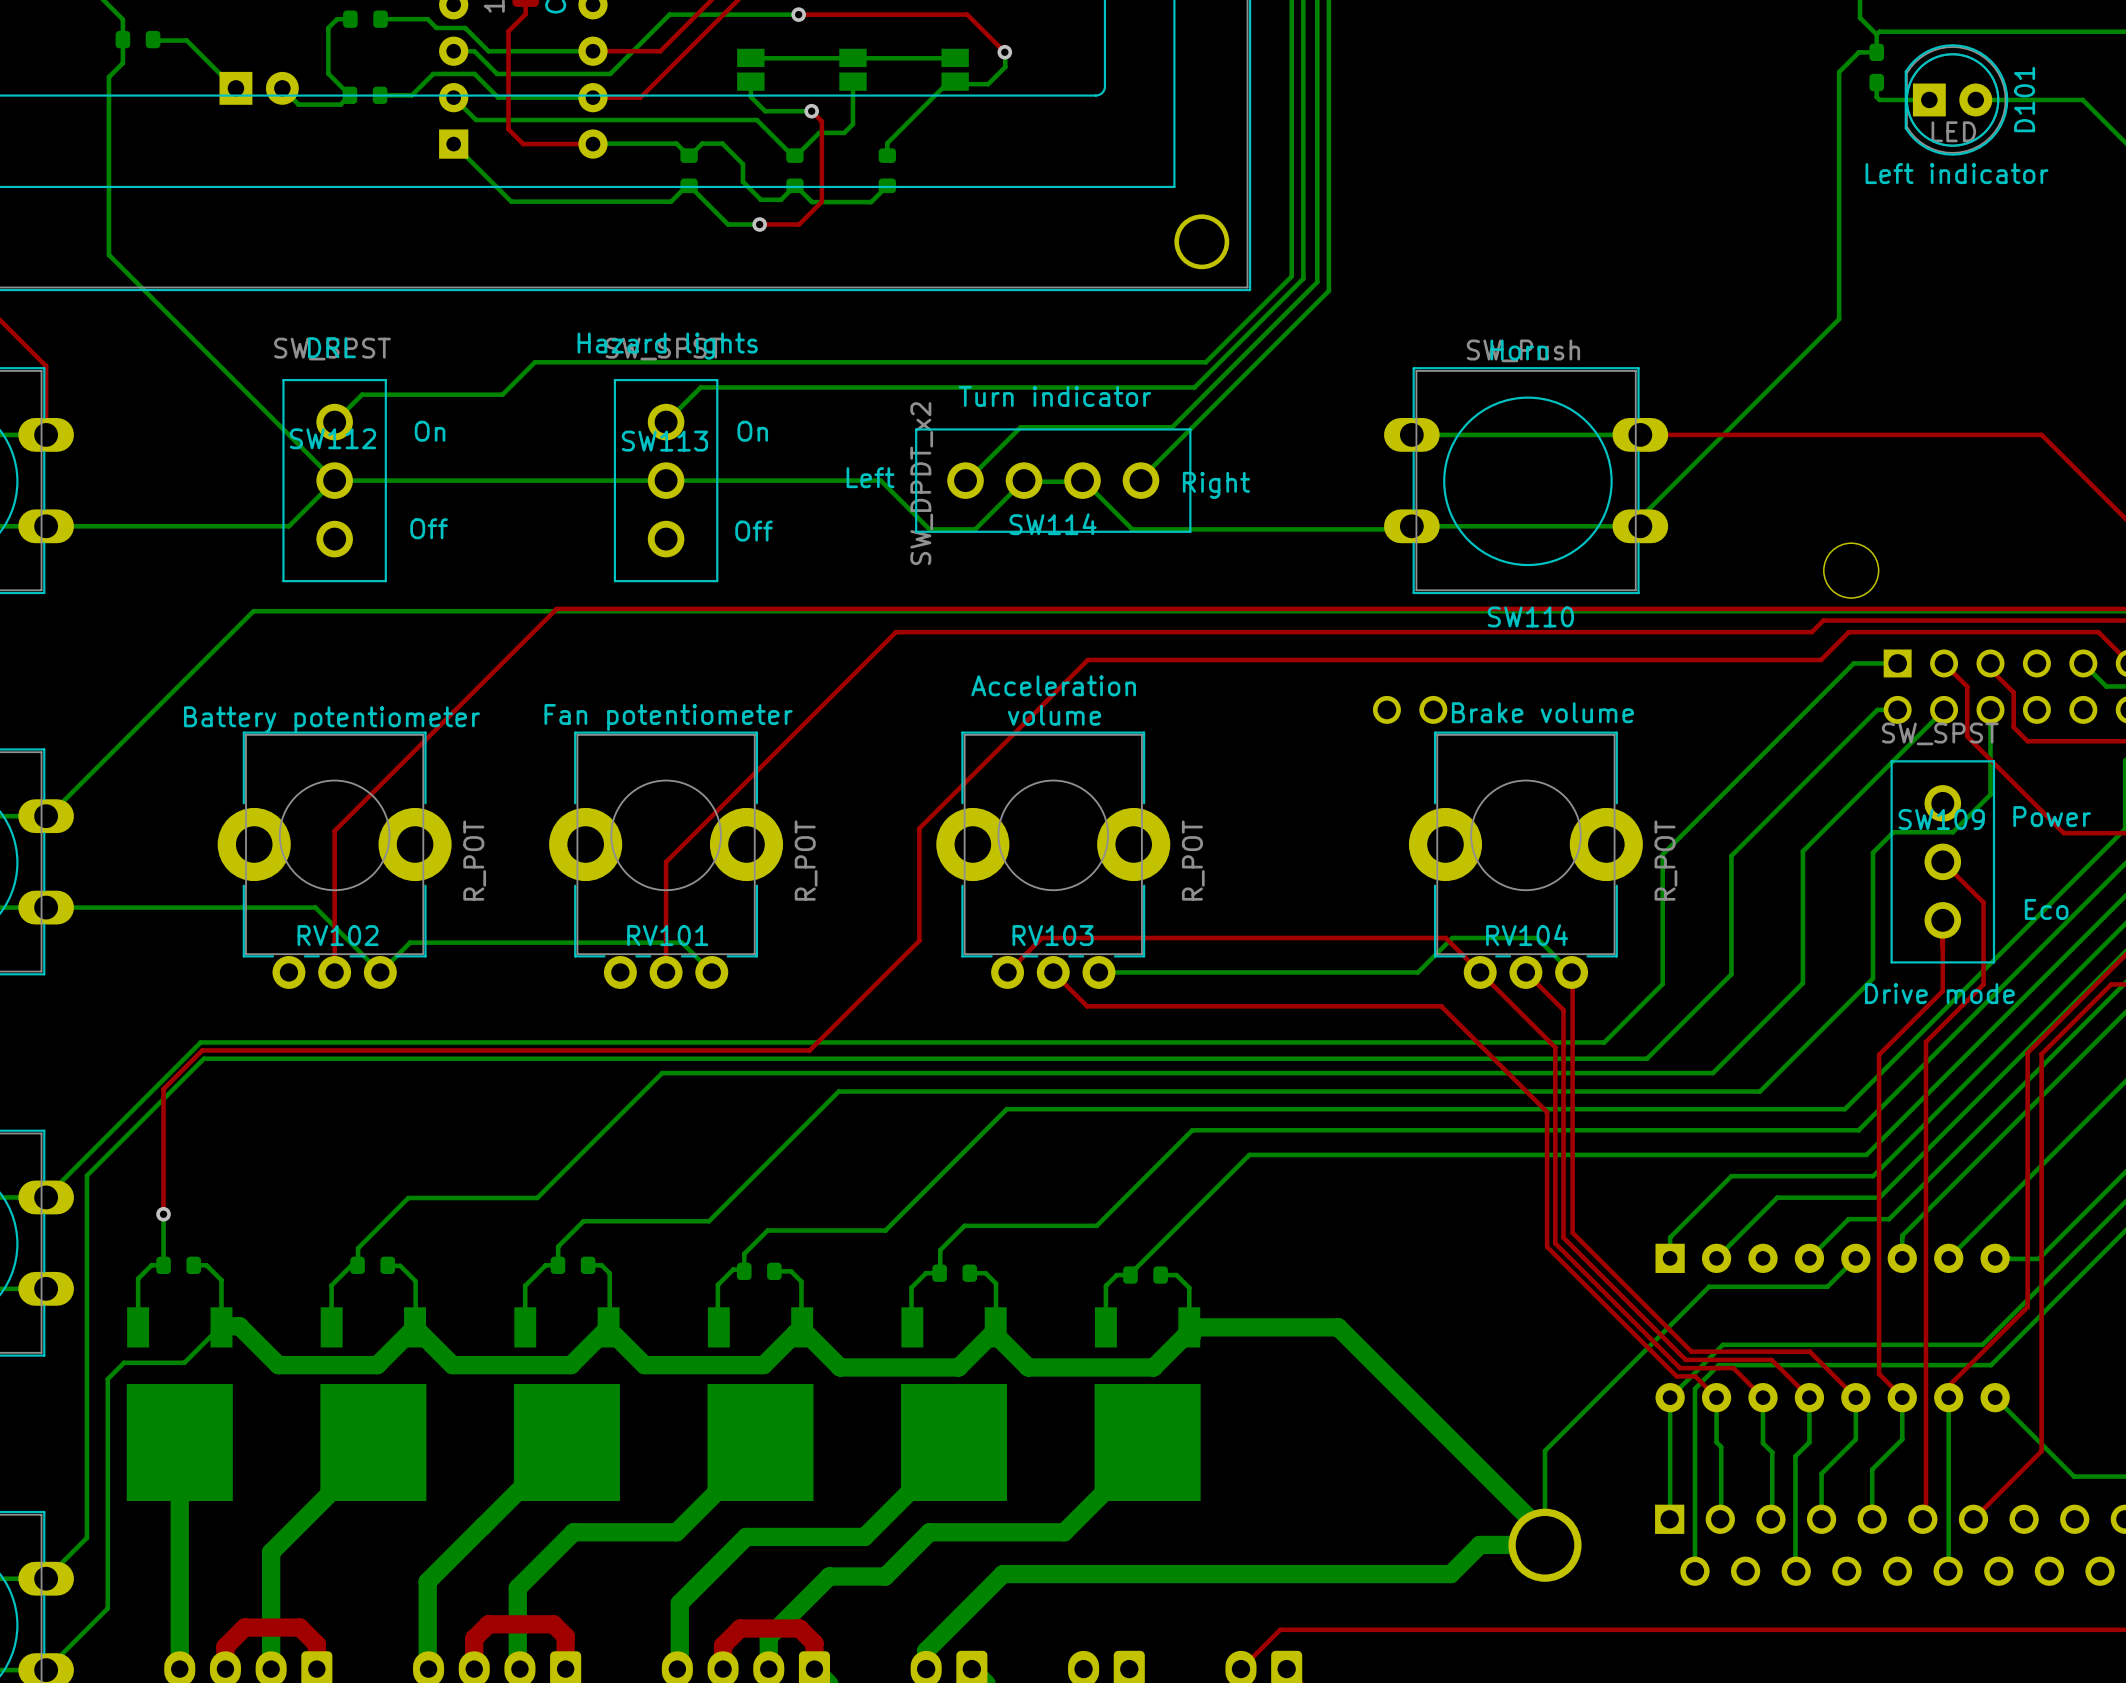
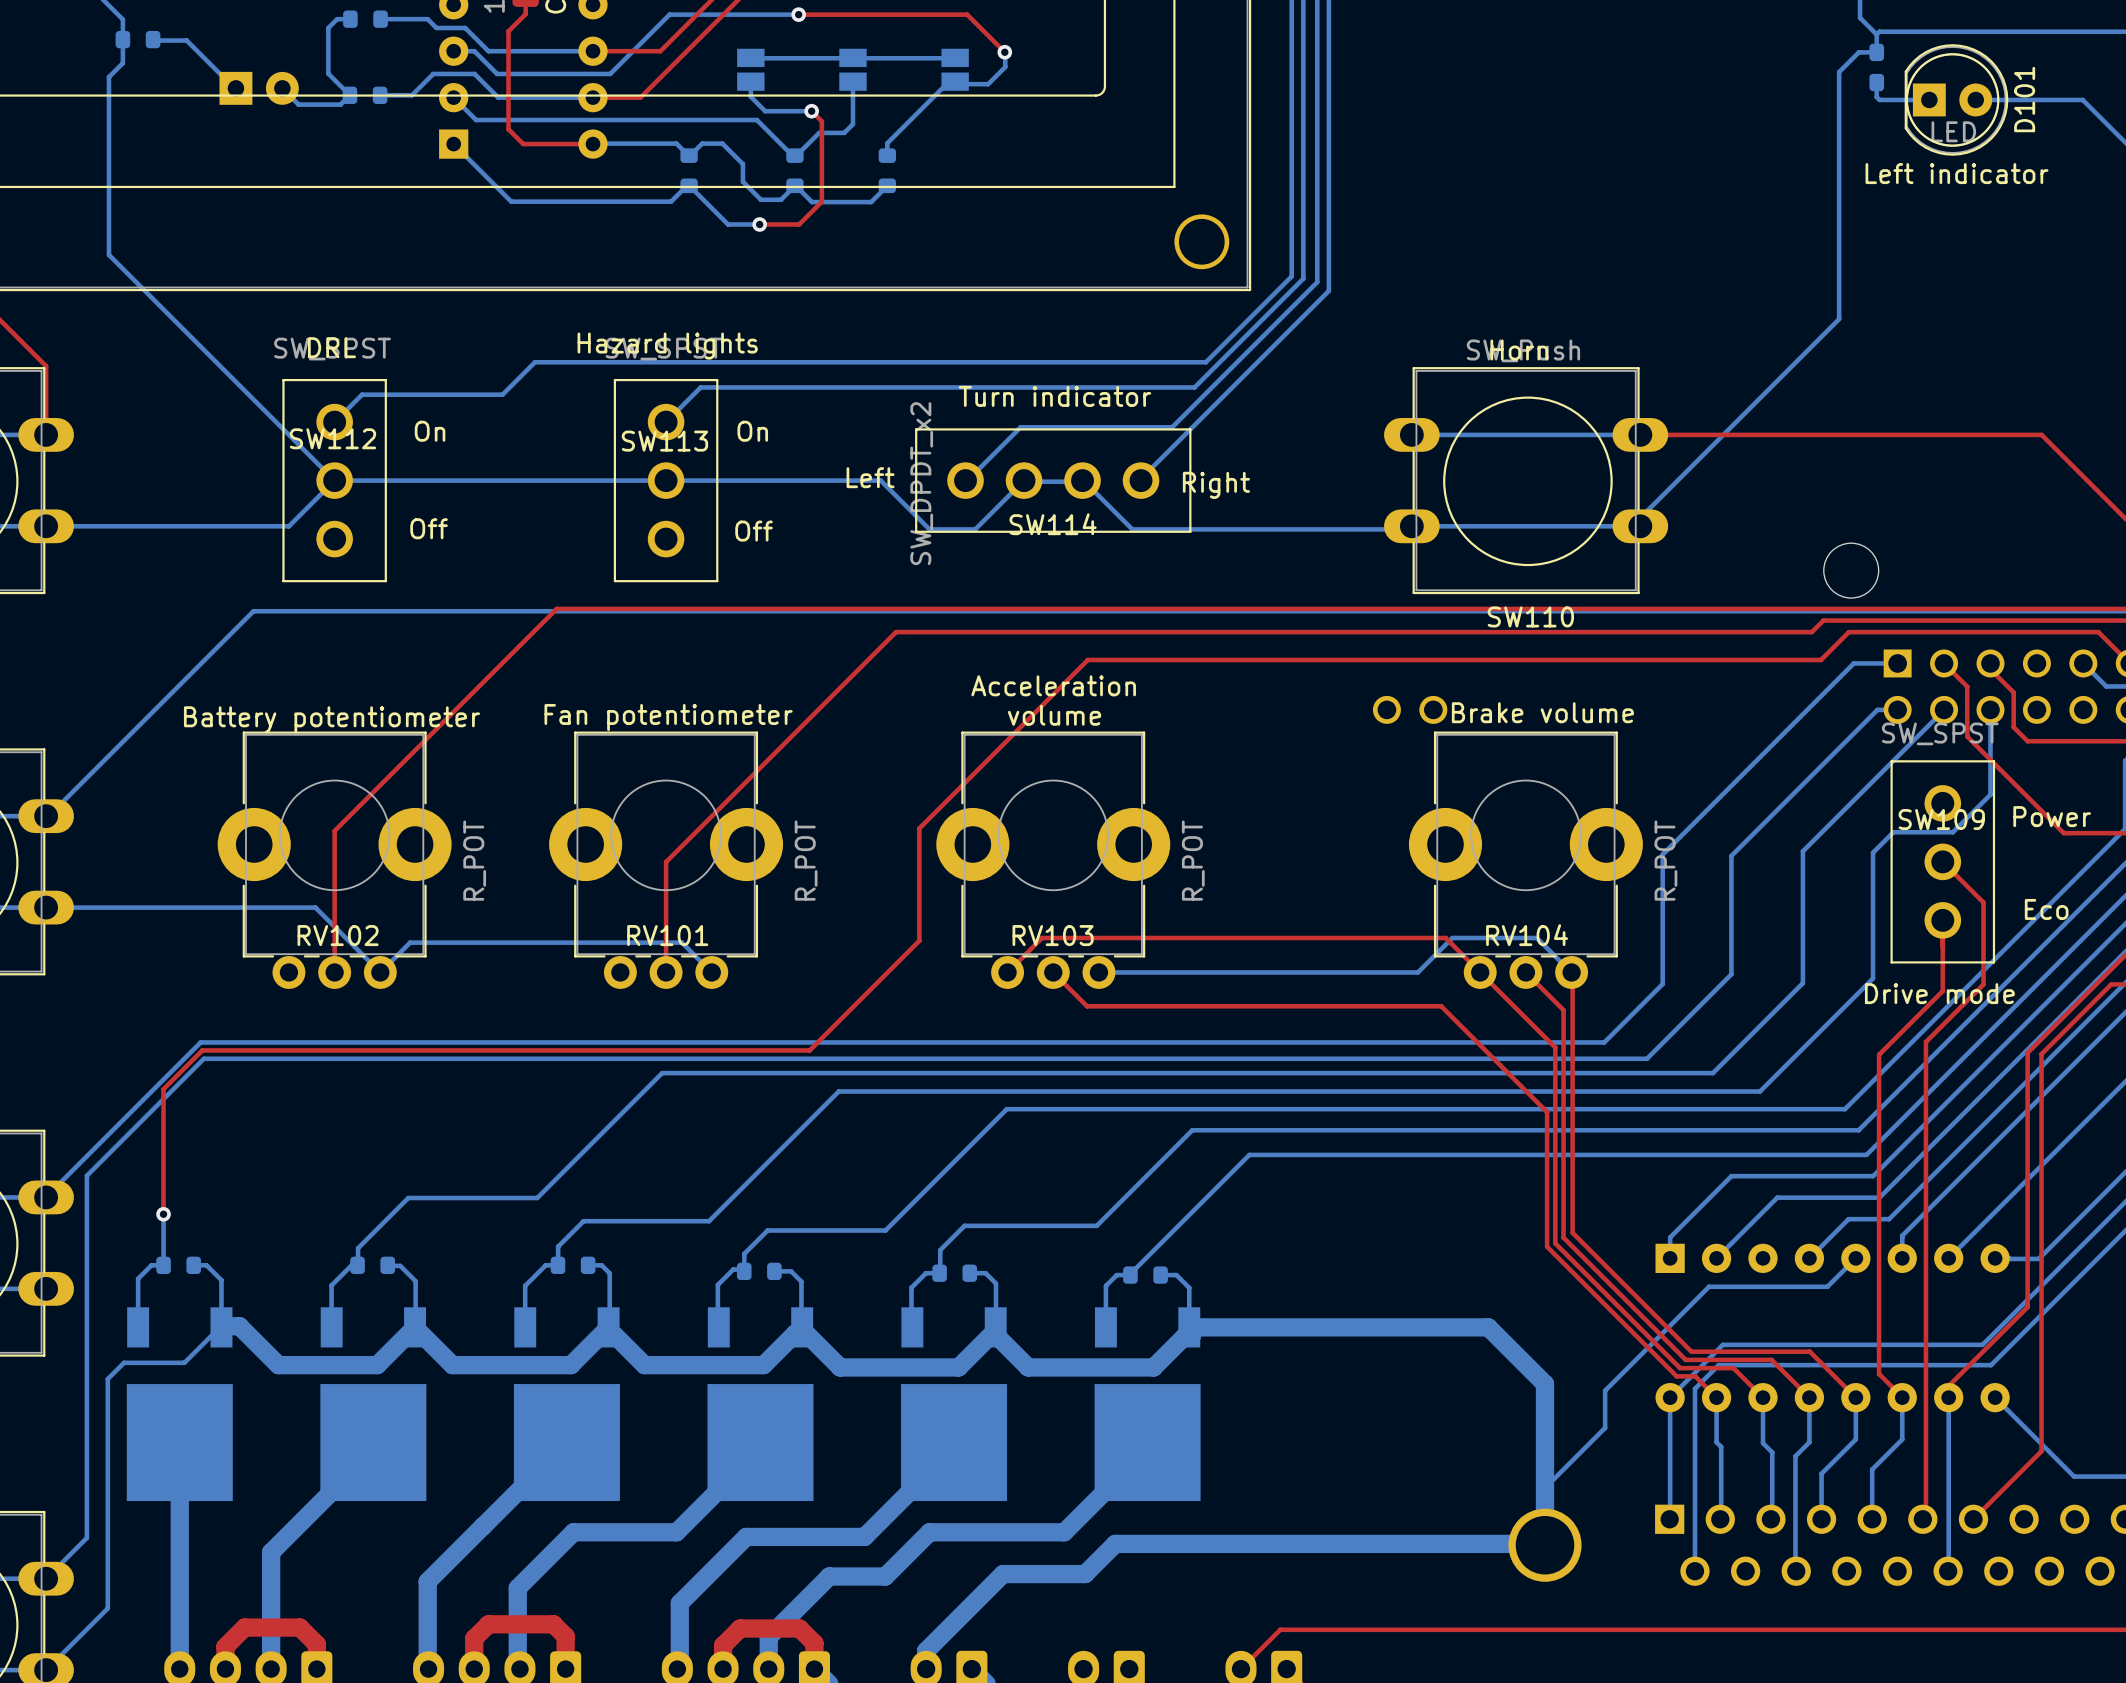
bottom track: (1338, 1327) (1545, 1534) -> (1338, 1327) (1488, 1327) (1545, 1383) (1545, 1450)
bottom track: (1605, 1390) (1545, 1450) -> (1605, 1390) (1605, 1427) (1545, 1488) (1545, 1534)
bottom track width: thin (1545, 1450) (1545, 1488) -> thick (1545, 1450) (1545, 1488)
bottom track: (1544, 1544) (1480, 1544) (1450, 1574) (1085, 1574) -> (1544, 1544) (1115, 1543) (1085, 1574)

